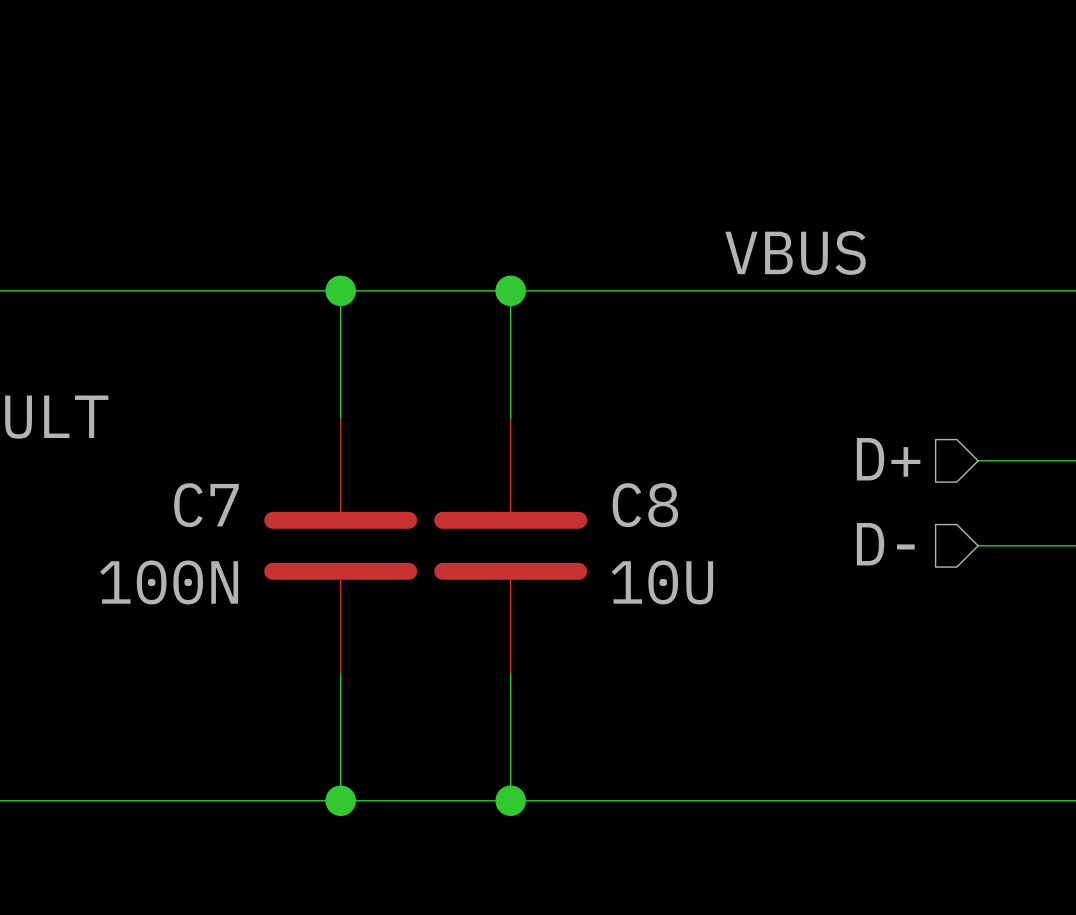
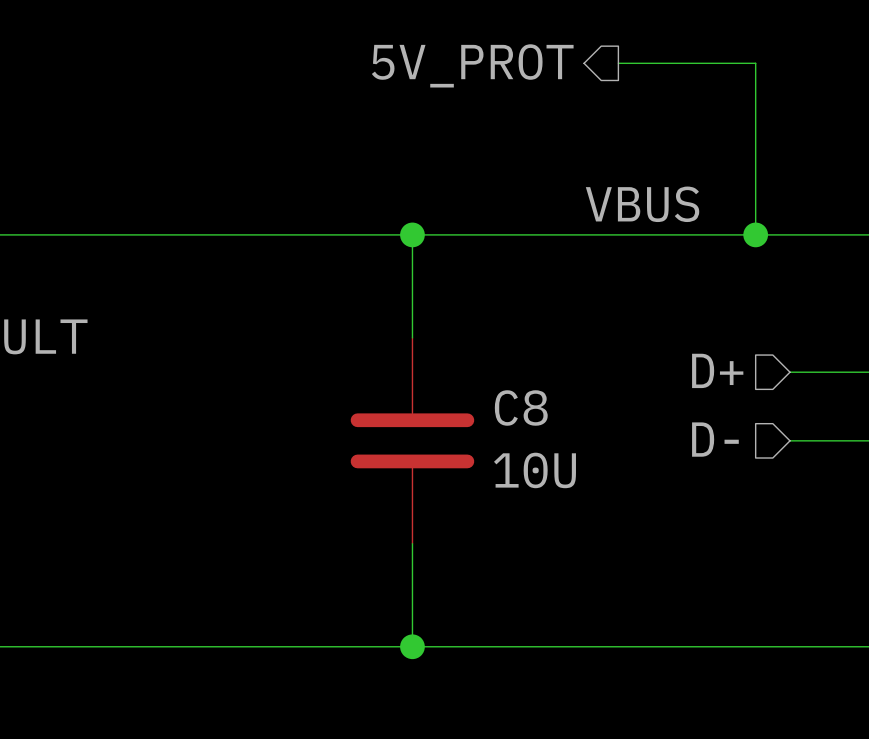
wire: none -> (618, 63) (755, 63) (755, 234)
hierarchical label: none -> 5V_PROT (472, 65)
wire: (340, 290) (340, 418) -> none
junction: (340, 290) -> none
junction: none -> (755, 234)
C7: 100N (340, 545) -> none
wire: (340, 673) (340, 800) -> none
junction: (340, 800) -> none

